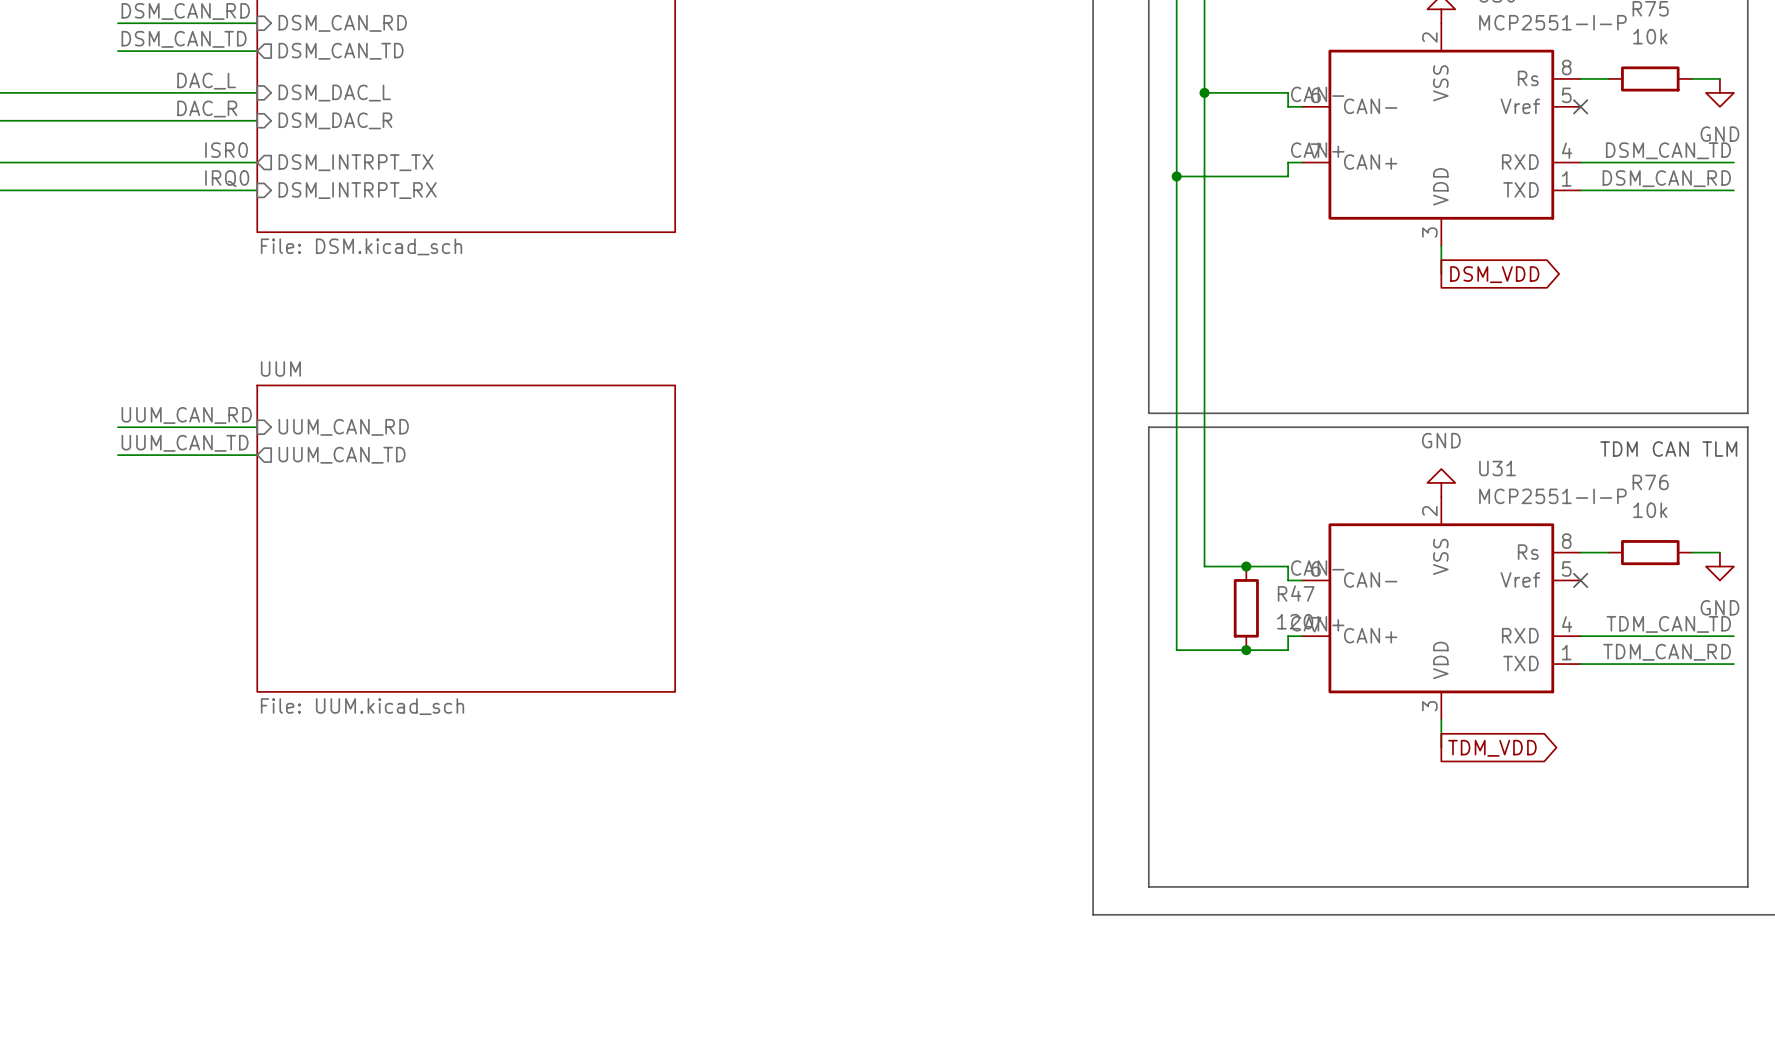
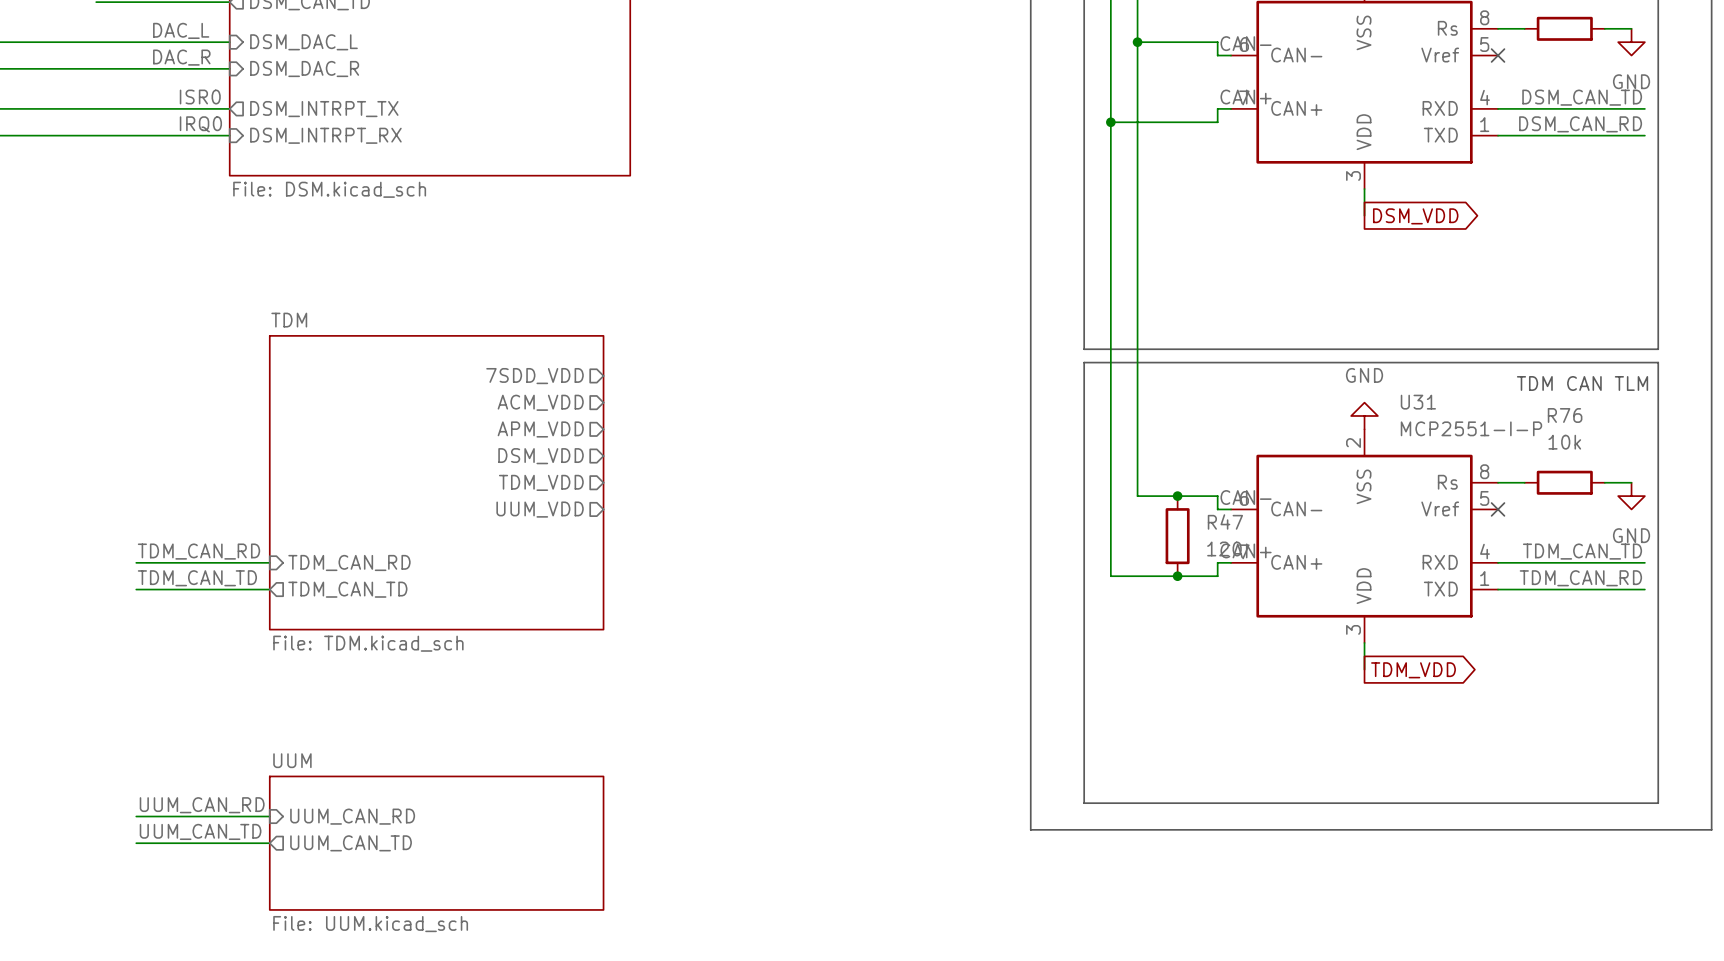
label: UUM_CAN_RD (186, 415) -> none
wire: (117, 427) (257, 427) -> (136, 562) (269, 562)
sheet pin: UUM_CAN_RD (343, 427) -> none
sheet pin: none -> 7SDD_VDD (534, 376)
label: UUM_CAN_TD (185, 443) -> none
wire: (117, 455) (257, 455) -> (136, 589) (269, 589)
sheet pin: UUM_CAN_TD (342, 455) -> none
sheet pin: none -> ACM_VDD (540, 402)
sheet pin: none -> APM_VDD (540, 429)
sheet pin: none -> DSM_VDD (541, 456)
sheet UUM: File: UUM.kicad_sch (466, 538) -> none
sheet TDM: none -> File: TDM.kicad_sch (436, 482)
sheet pin: none -> TDM_VDD (541, 482)
sheet pin: none -> UUM_VDD (540, 509)
label: none -> TDM_CAN_RD (198, 551)
sheet pin: none -> TDM_CAN_RD (349, 562)
label: none -> TDM_CAN_TD (197, 578)
sheet pin: none -> TDM_CAN_TD (347, 589)
label: none -> UUM_CAN_RD (202, 805)
wire: none -> (136, 816) (269, 816)
sheet pin: none -> UUM_CAN_RD (352, 816)
label: none -> UUM_CAN_TD (200, 831)
wire: none -> (136, 843) (269, 843)
sheet pin: none -> UUM_CAN_TD (351, 843)
sheet UUM: none -> File: UUM.kicad_sch (436, 843)

